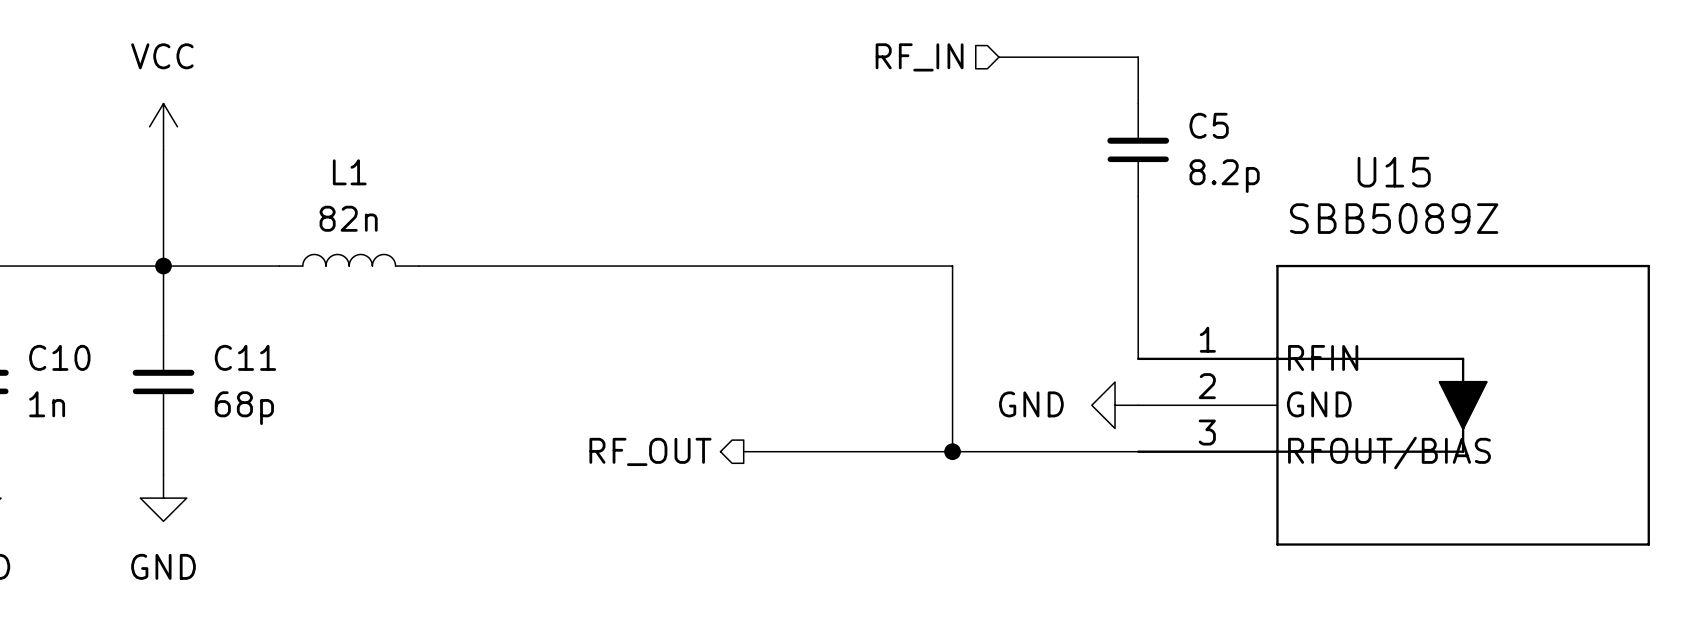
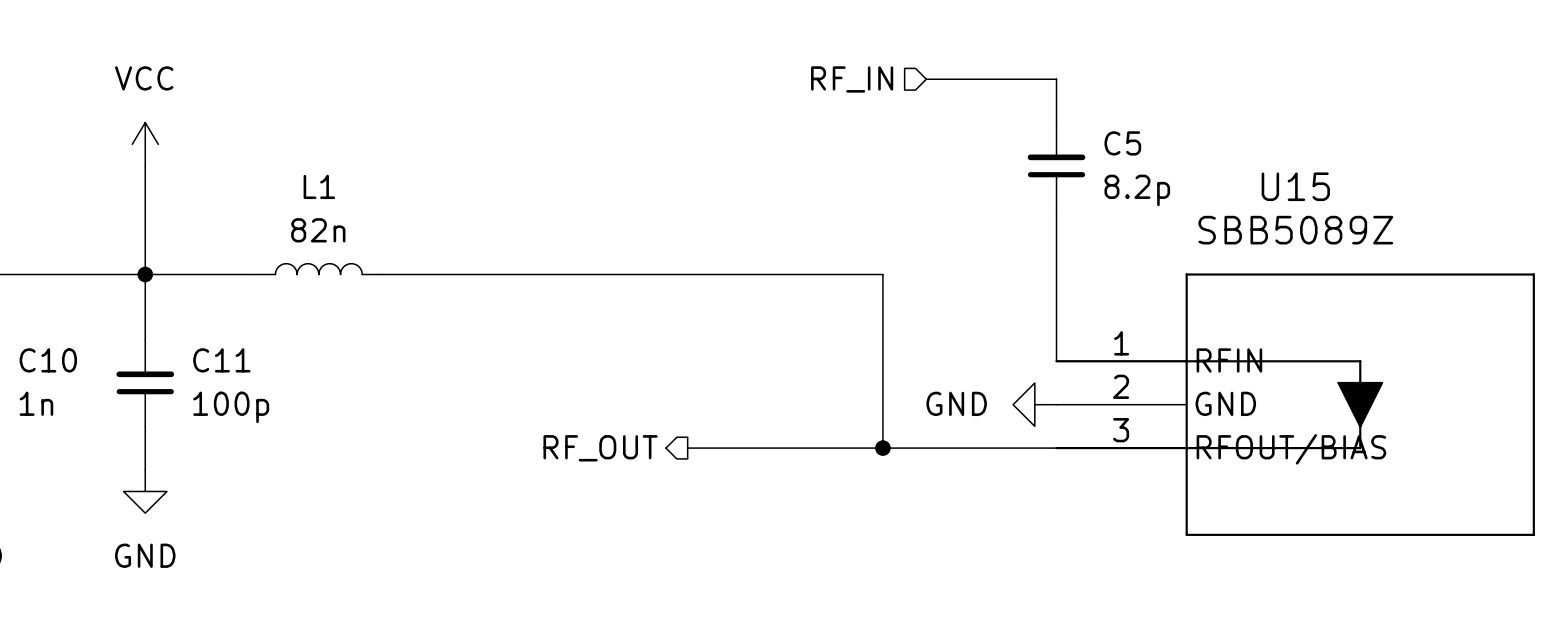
C11 value: 68p (244, 408) -> 100p (231, 407)

